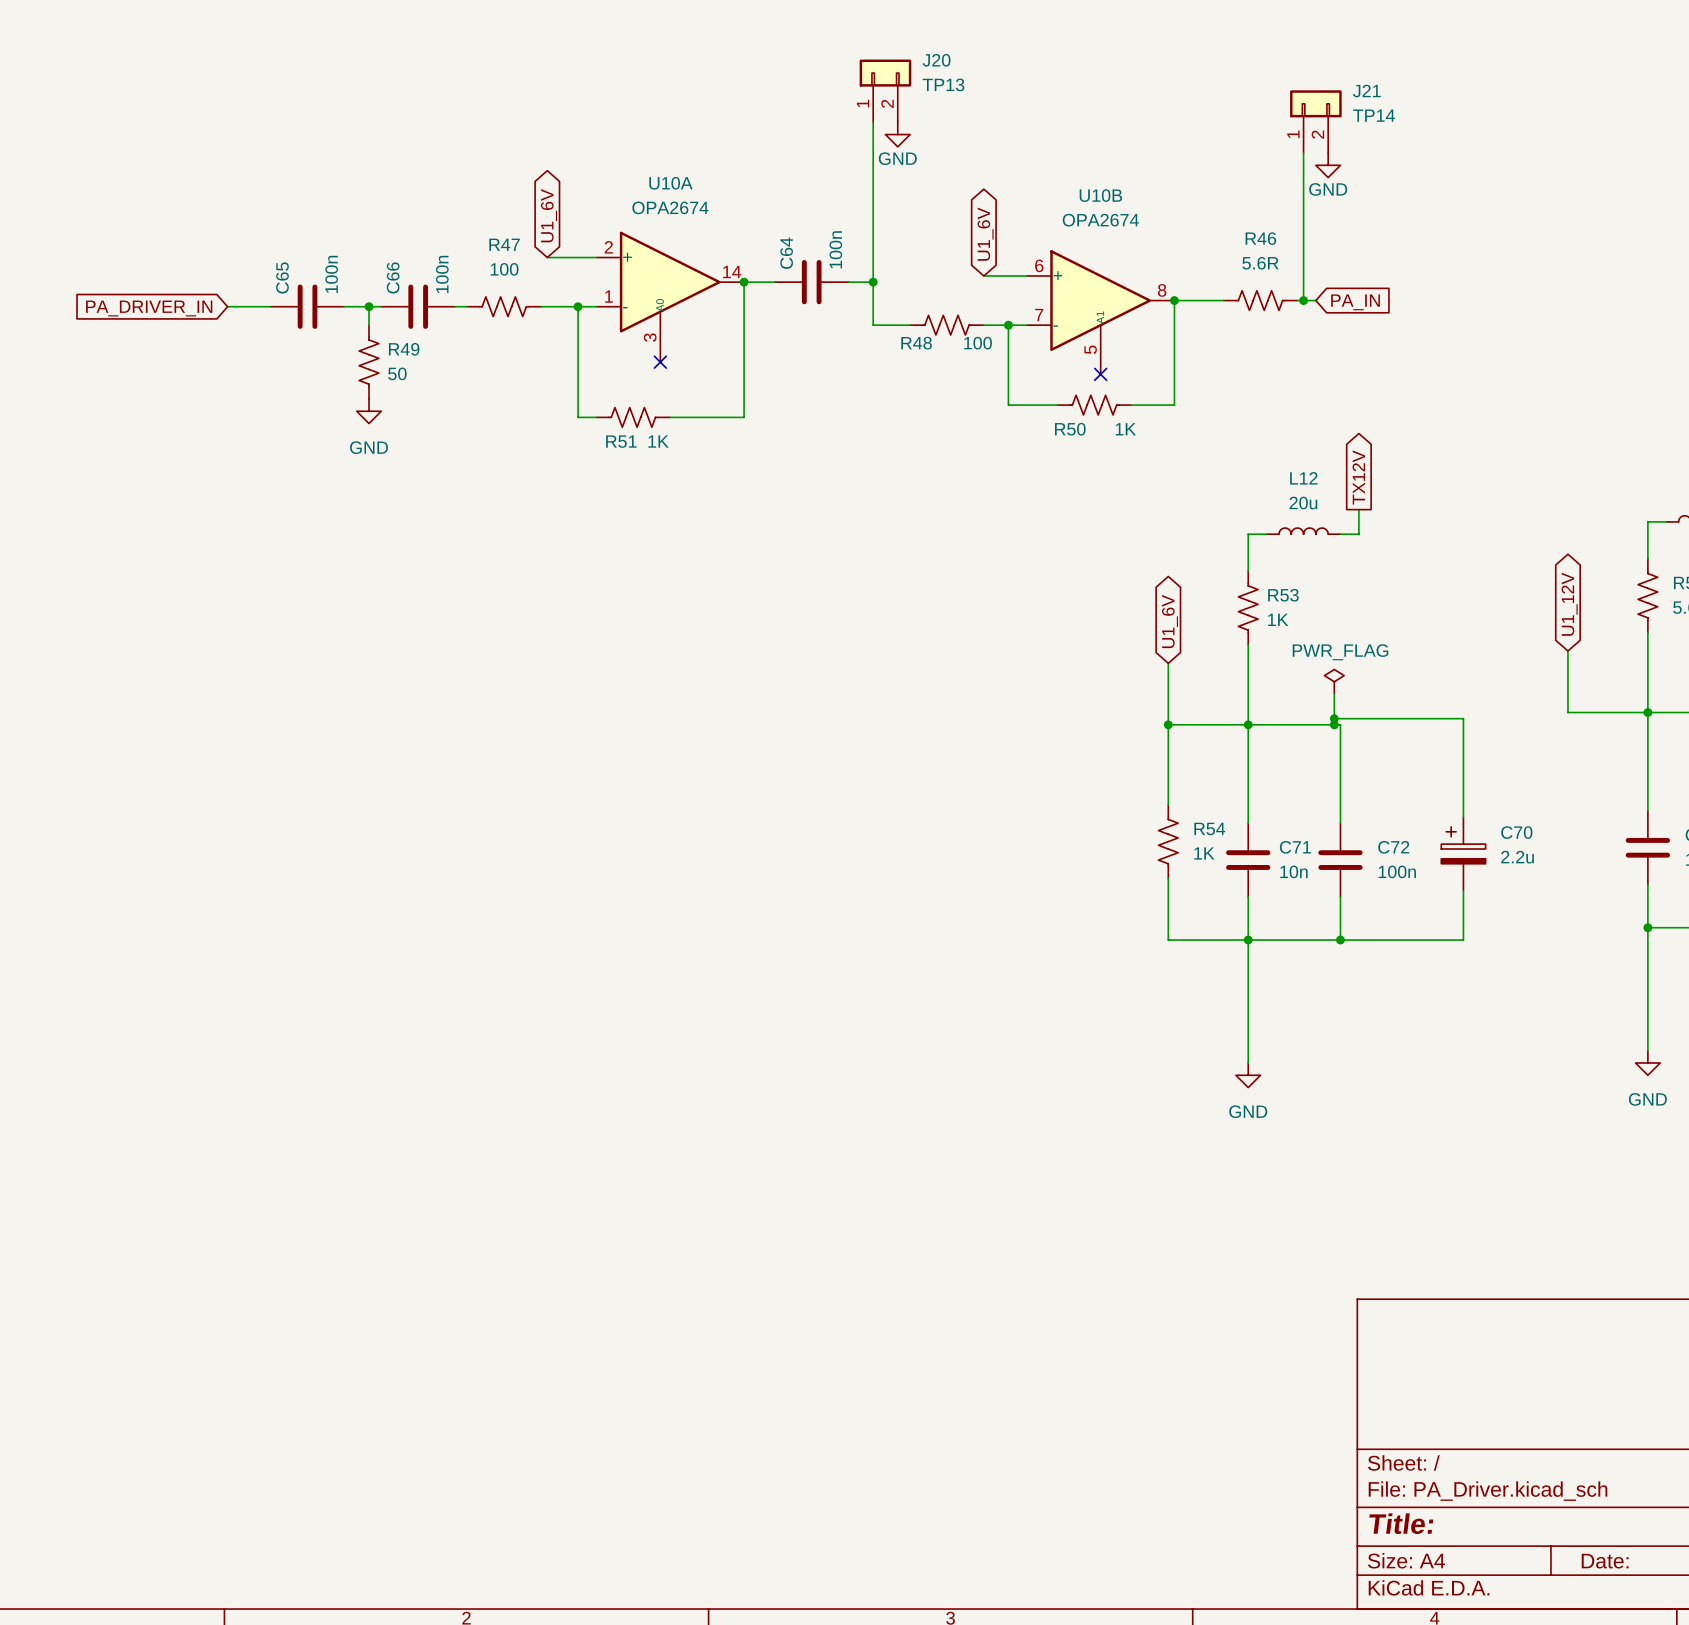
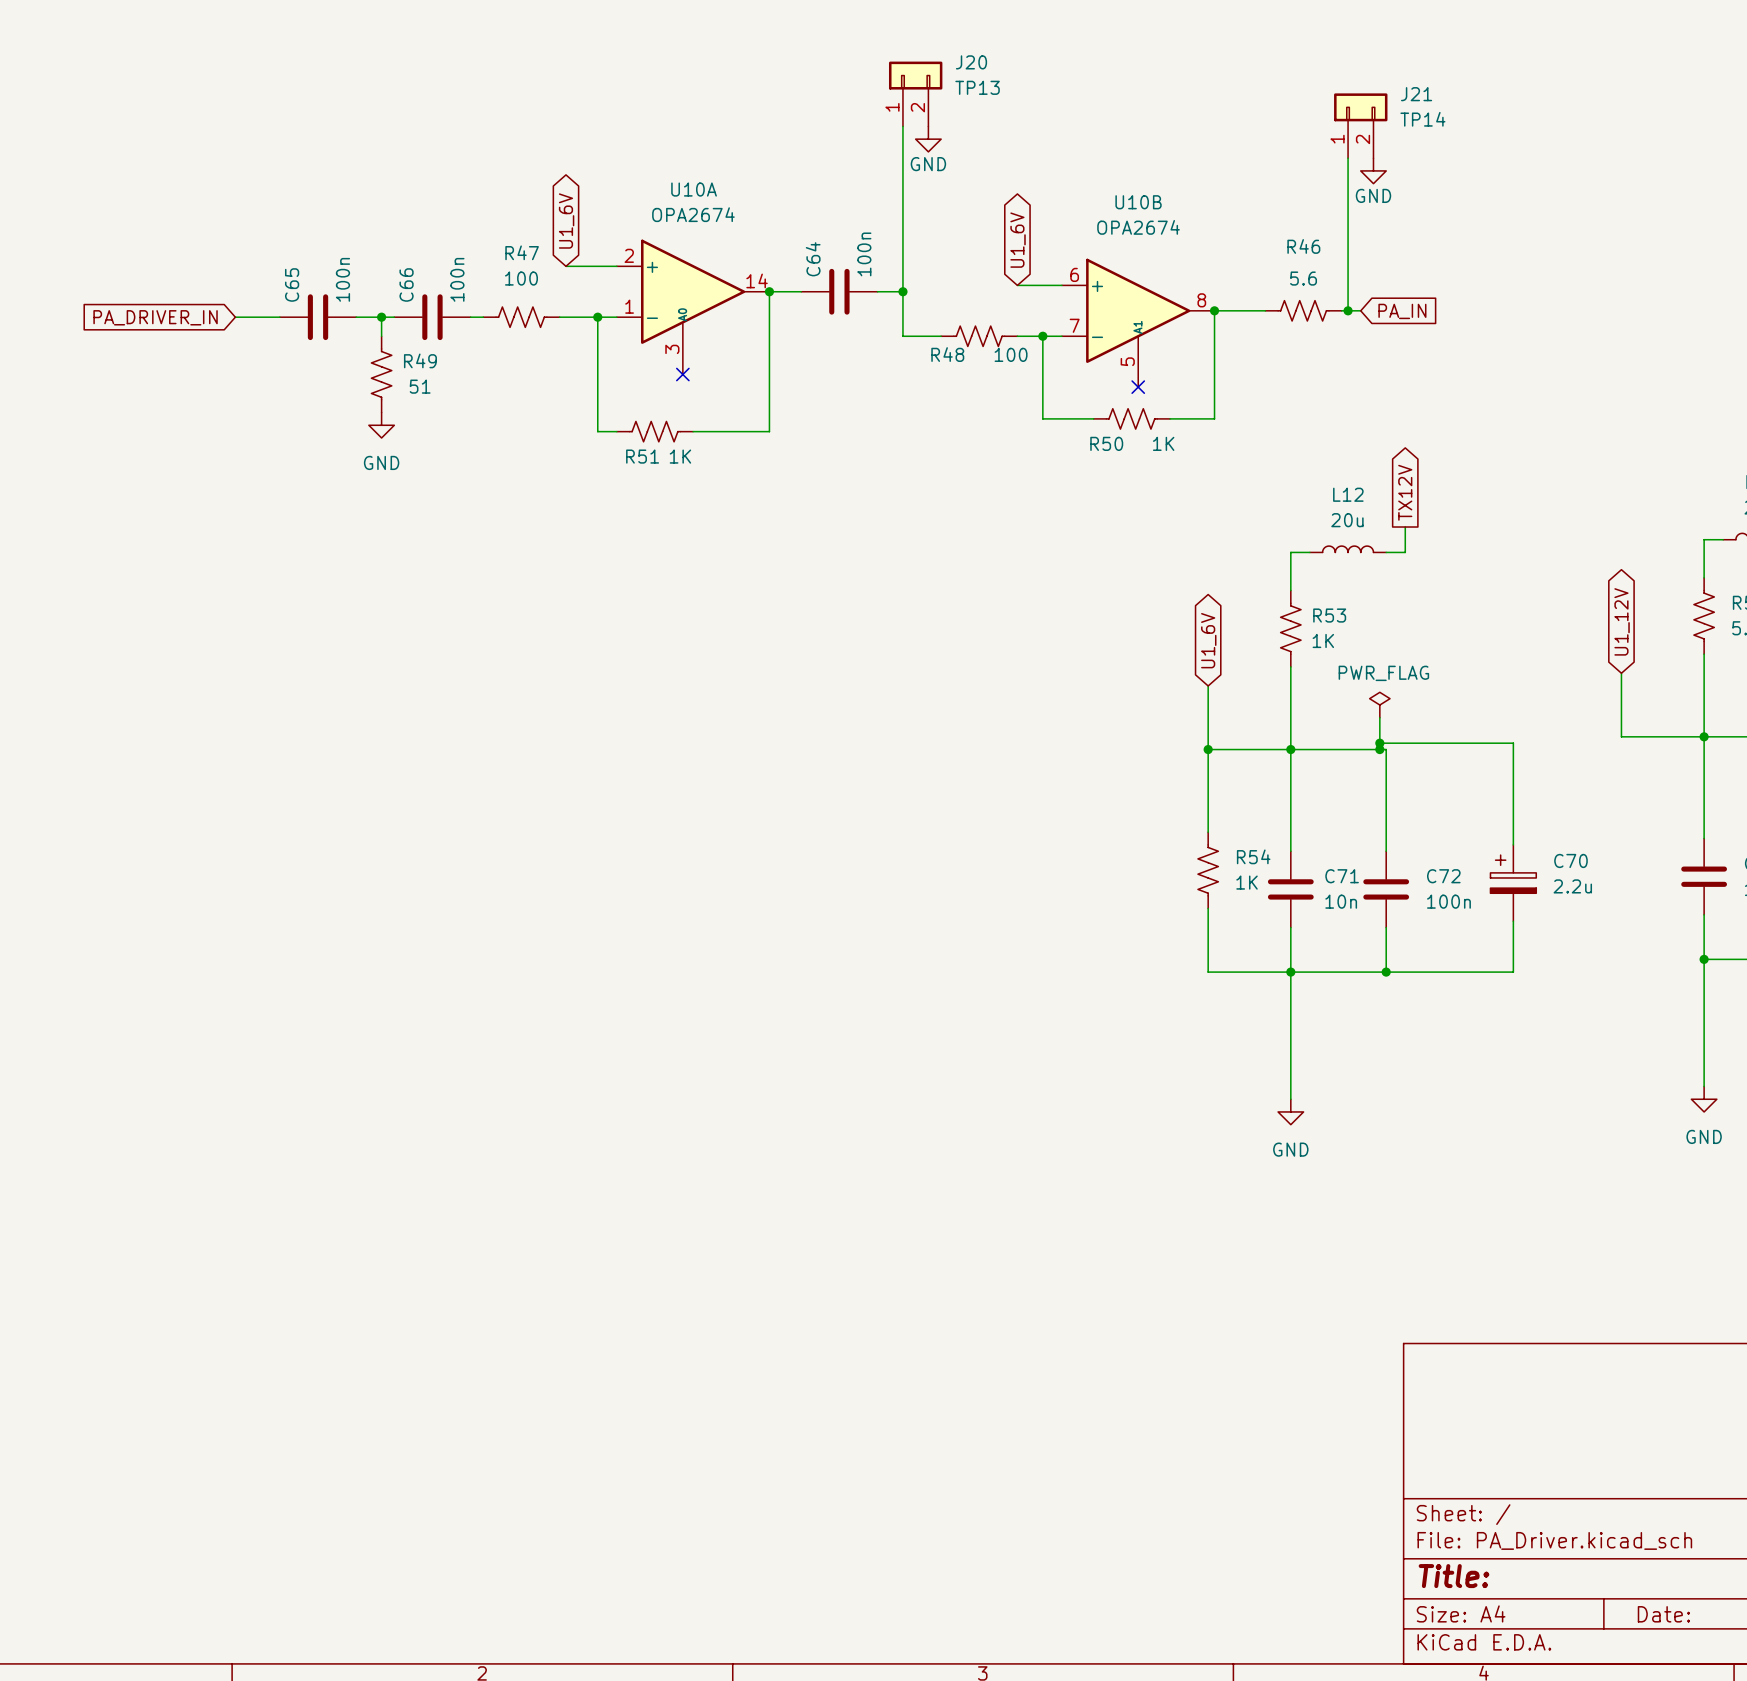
R46 value: 5.6R (1260, 263) -> 5.6 (1303, 278)
R49 value: 50 (397, 373) -> 51 (420, 386)

